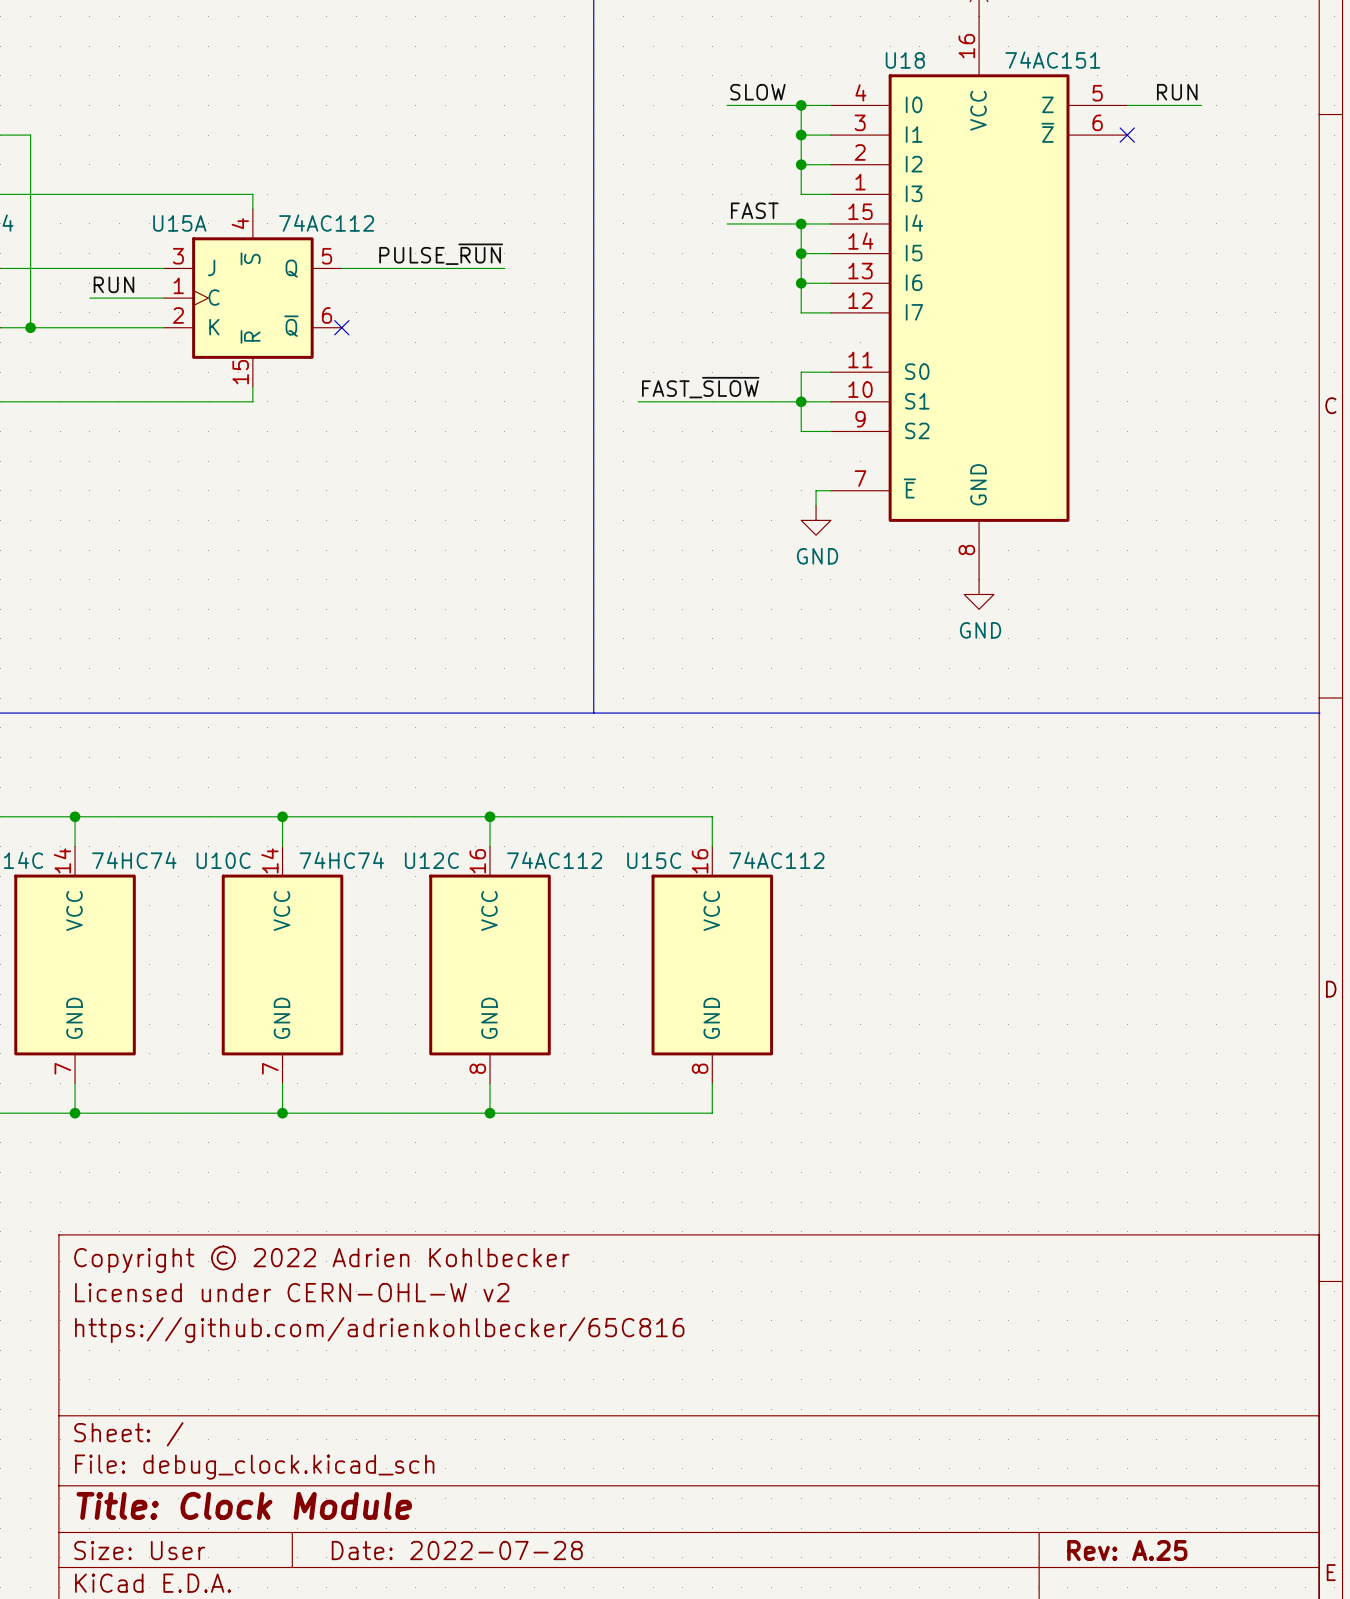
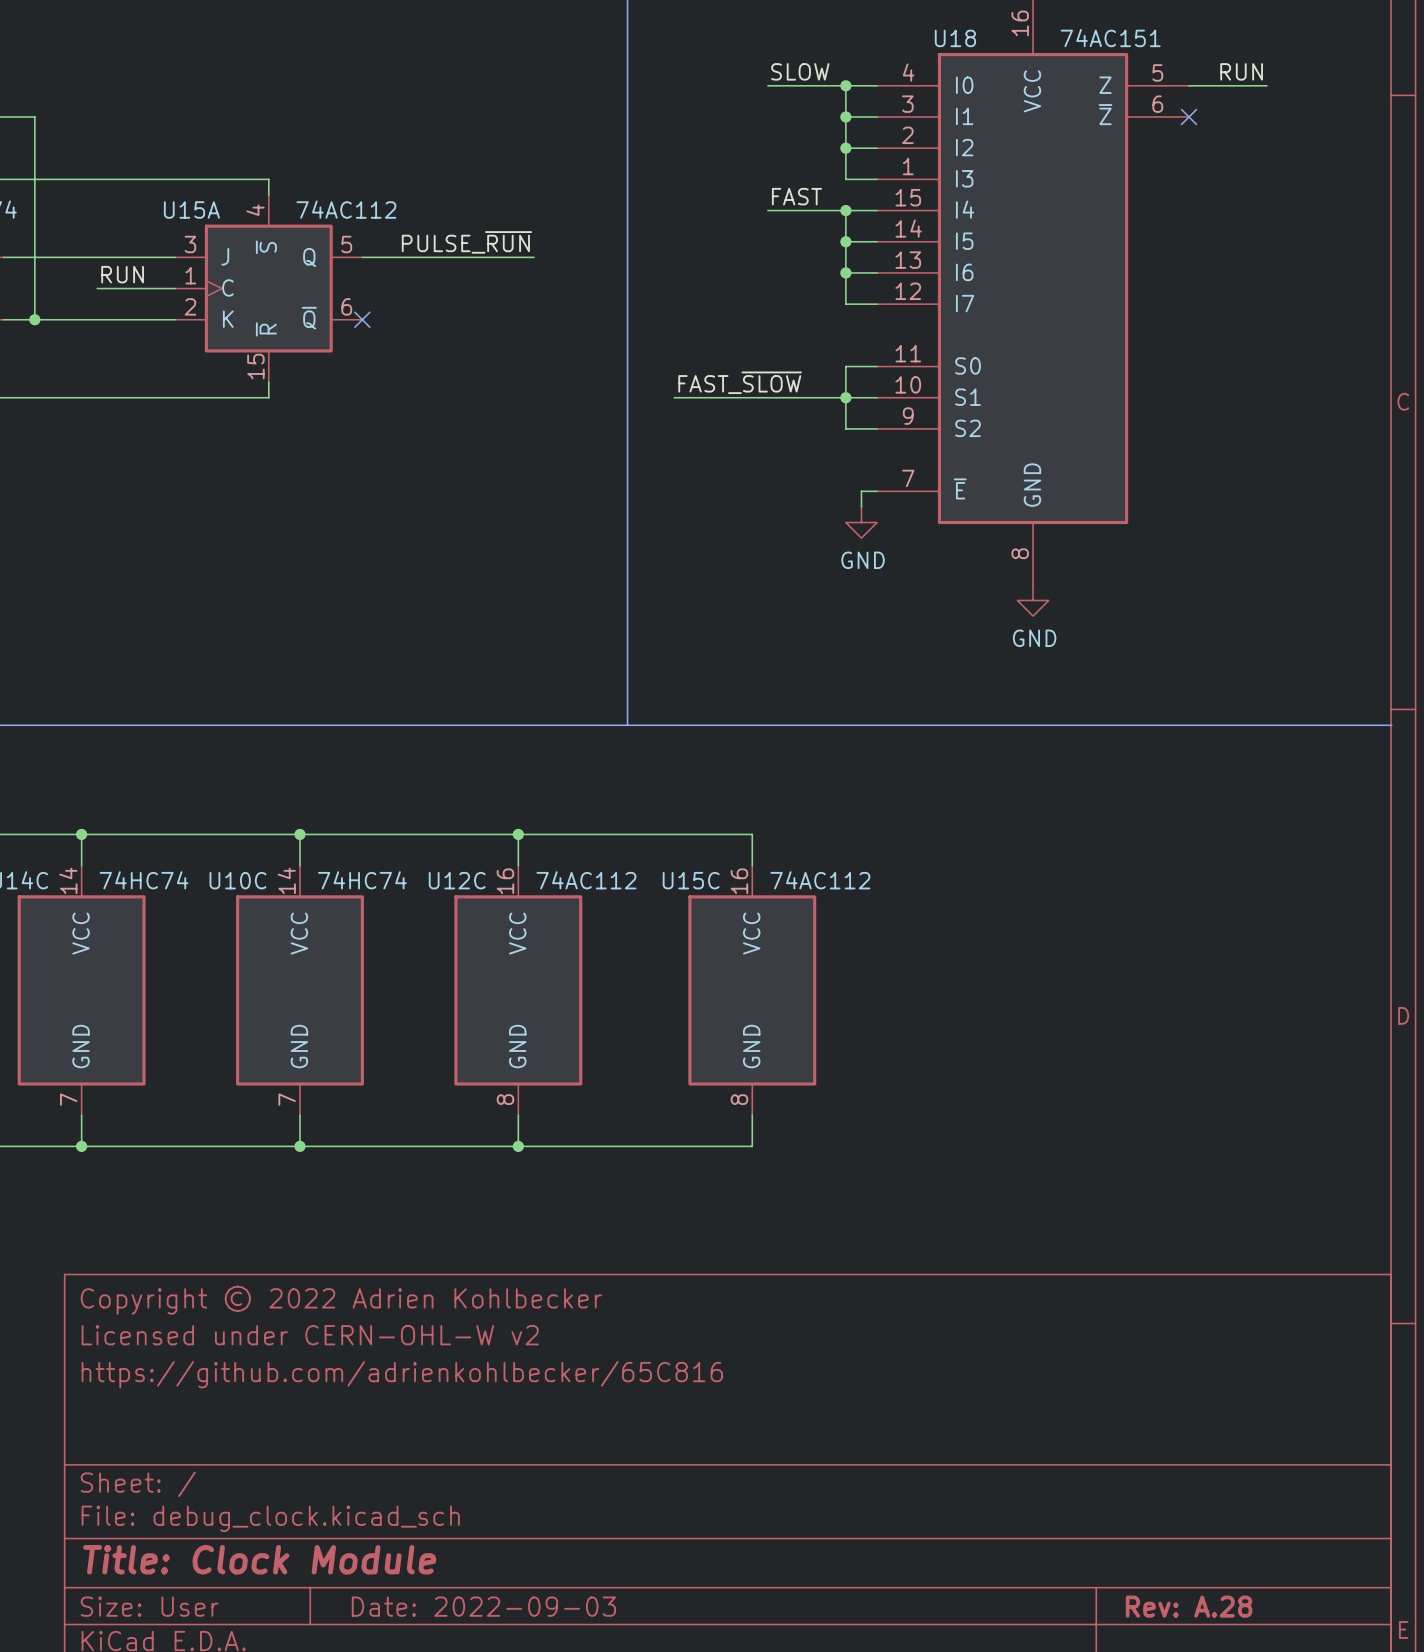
title block: Date: 2022-07-28 (457, 1550) -> Date: 2022-09-03 (483, 1606)
title block: Rev: A.25 (1127, 1550) -> Rev: A.28 (1189, 1606)

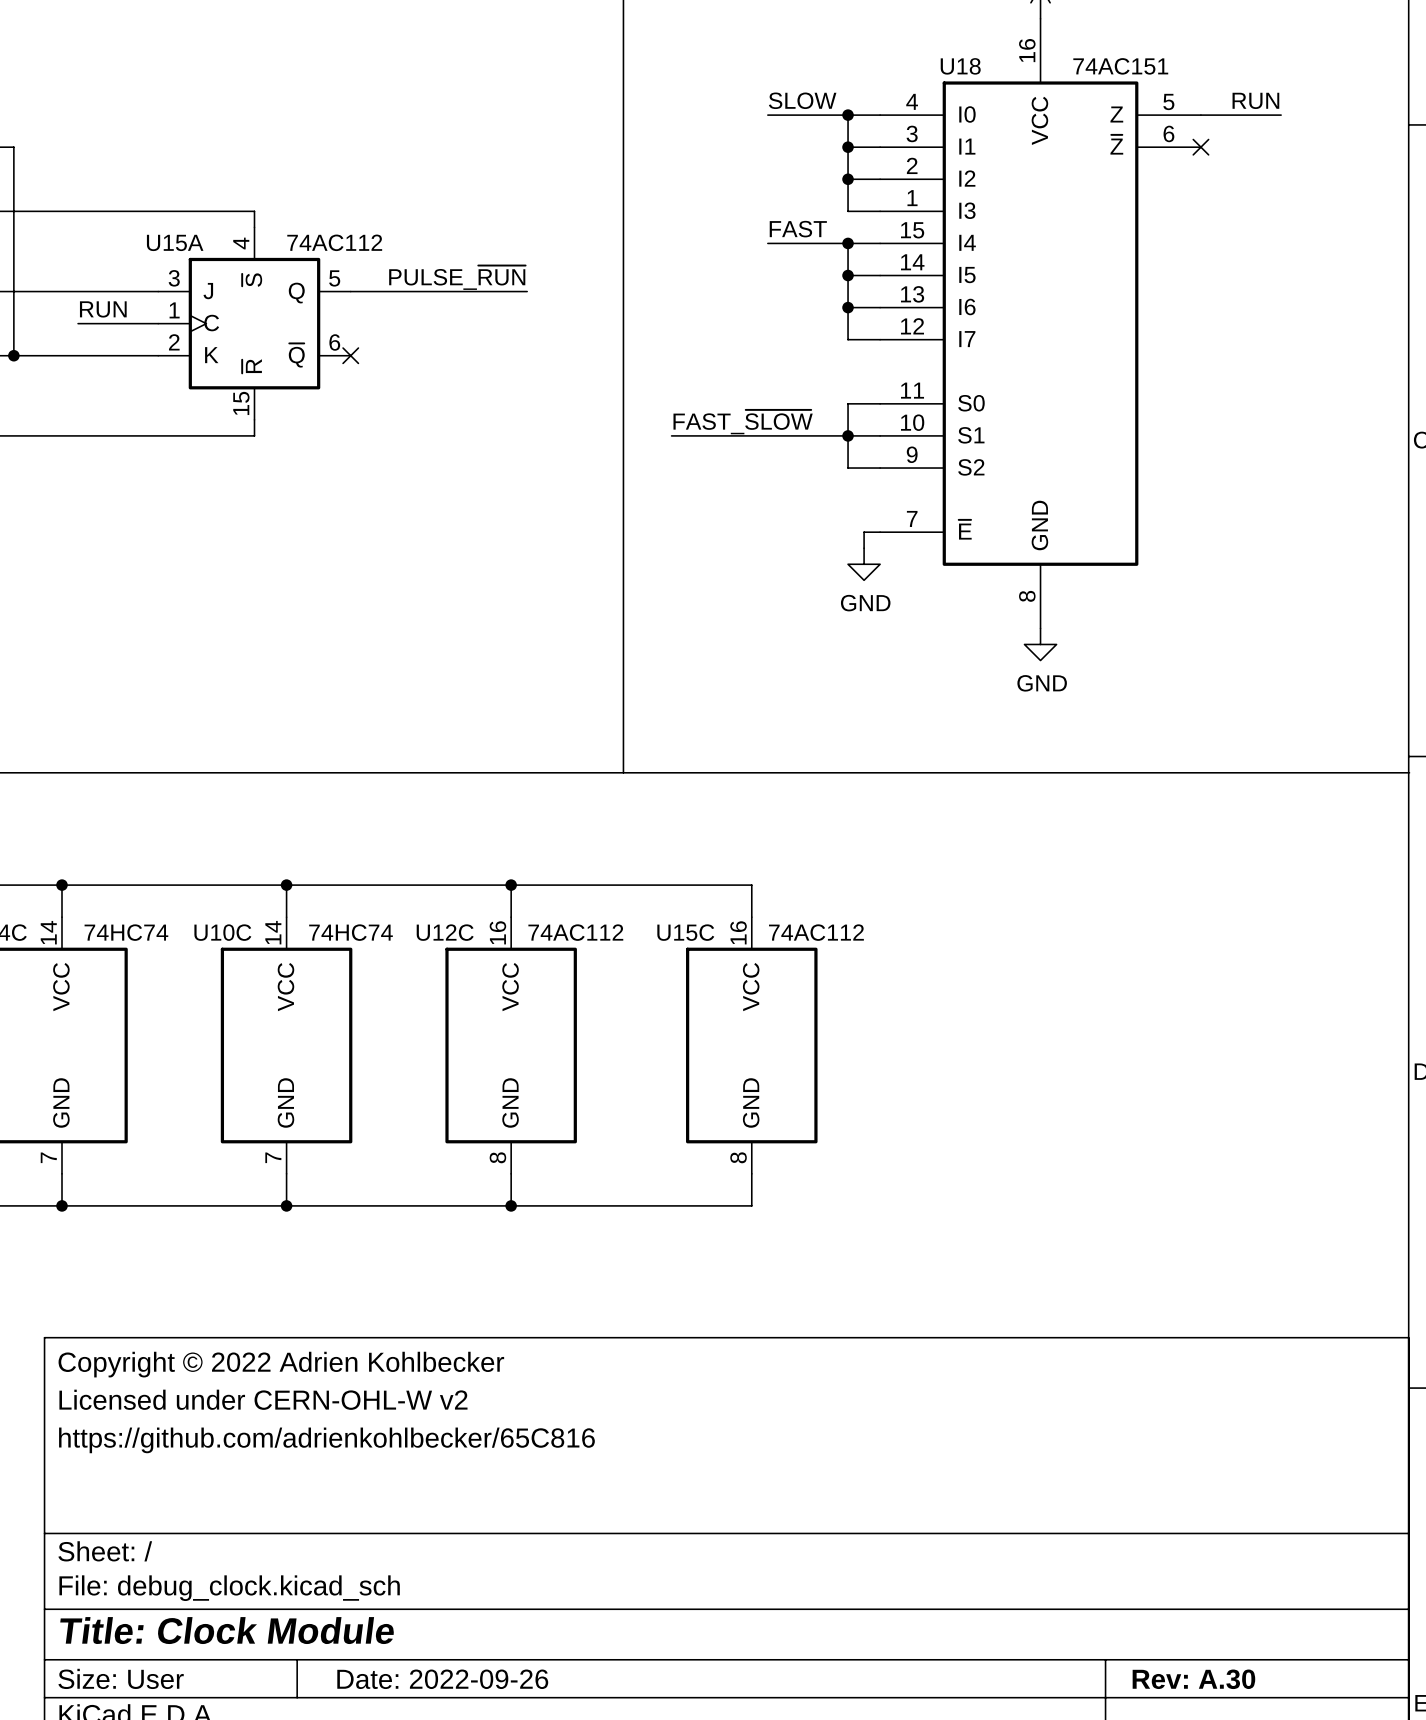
title block: Date: 2022-09-03 (483, 1606) -> Date: 2022-09-26 (442, 1679)
title block: Rev: A.28 (1189, 1606) -> Rev: A.30 (1193, 1679)

